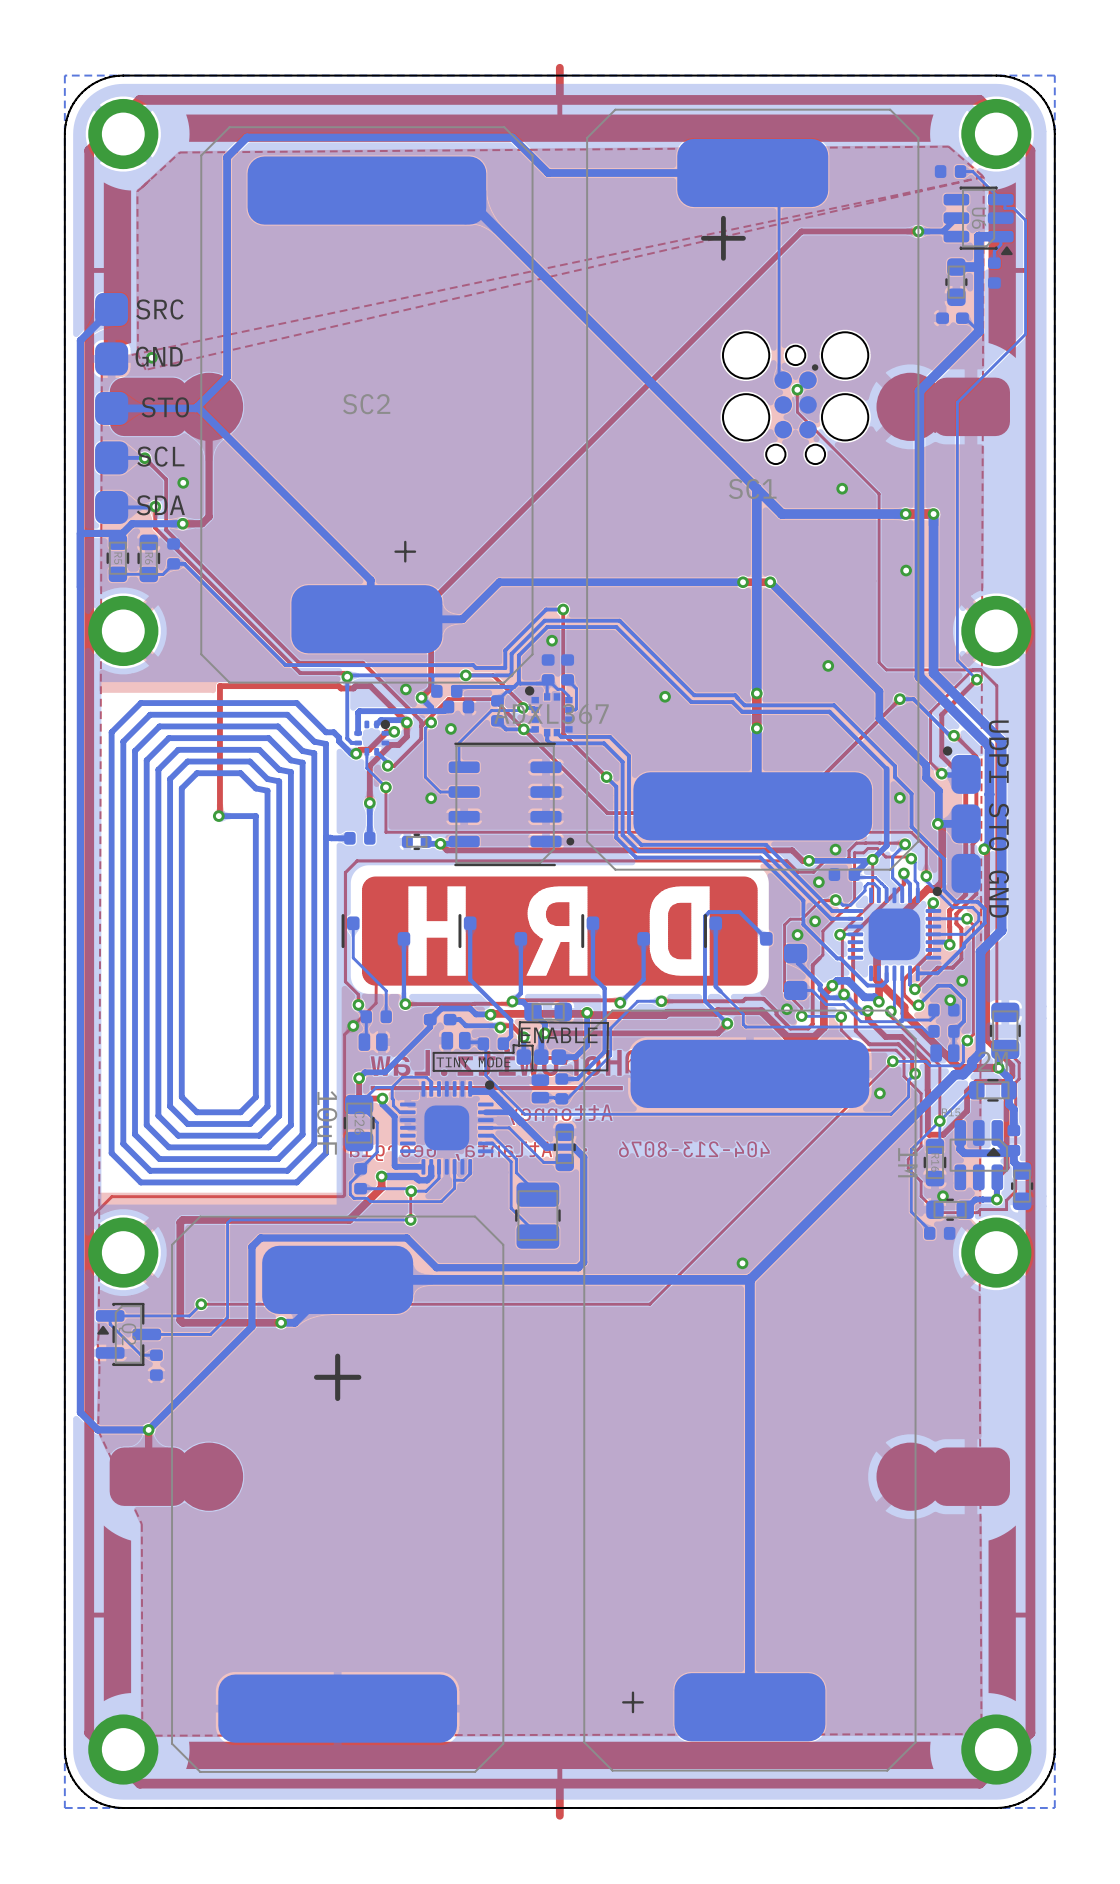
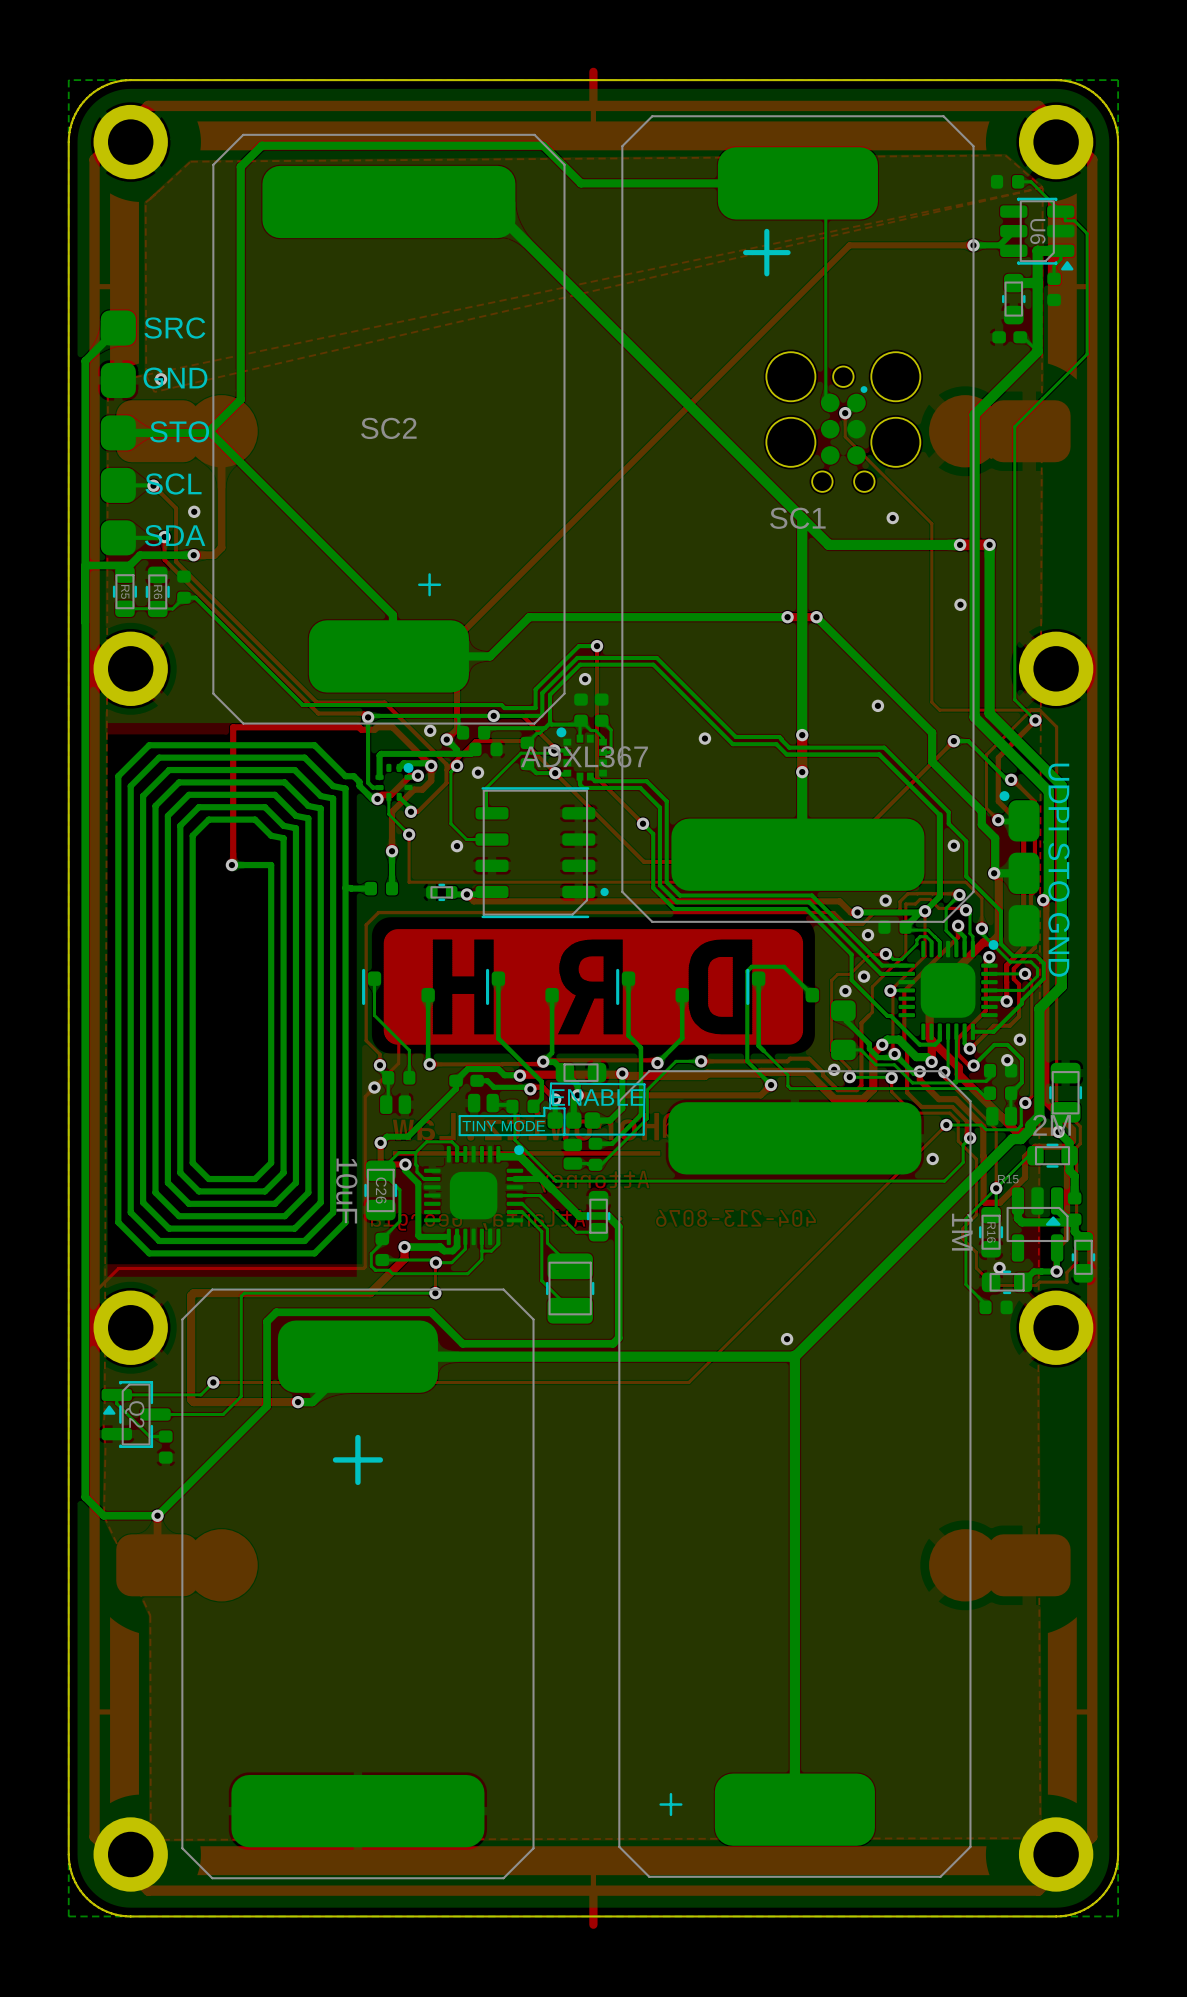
part footprint: [949, 1120, 1009, 1191] -> [1006, 1187, 1069, 1262]

